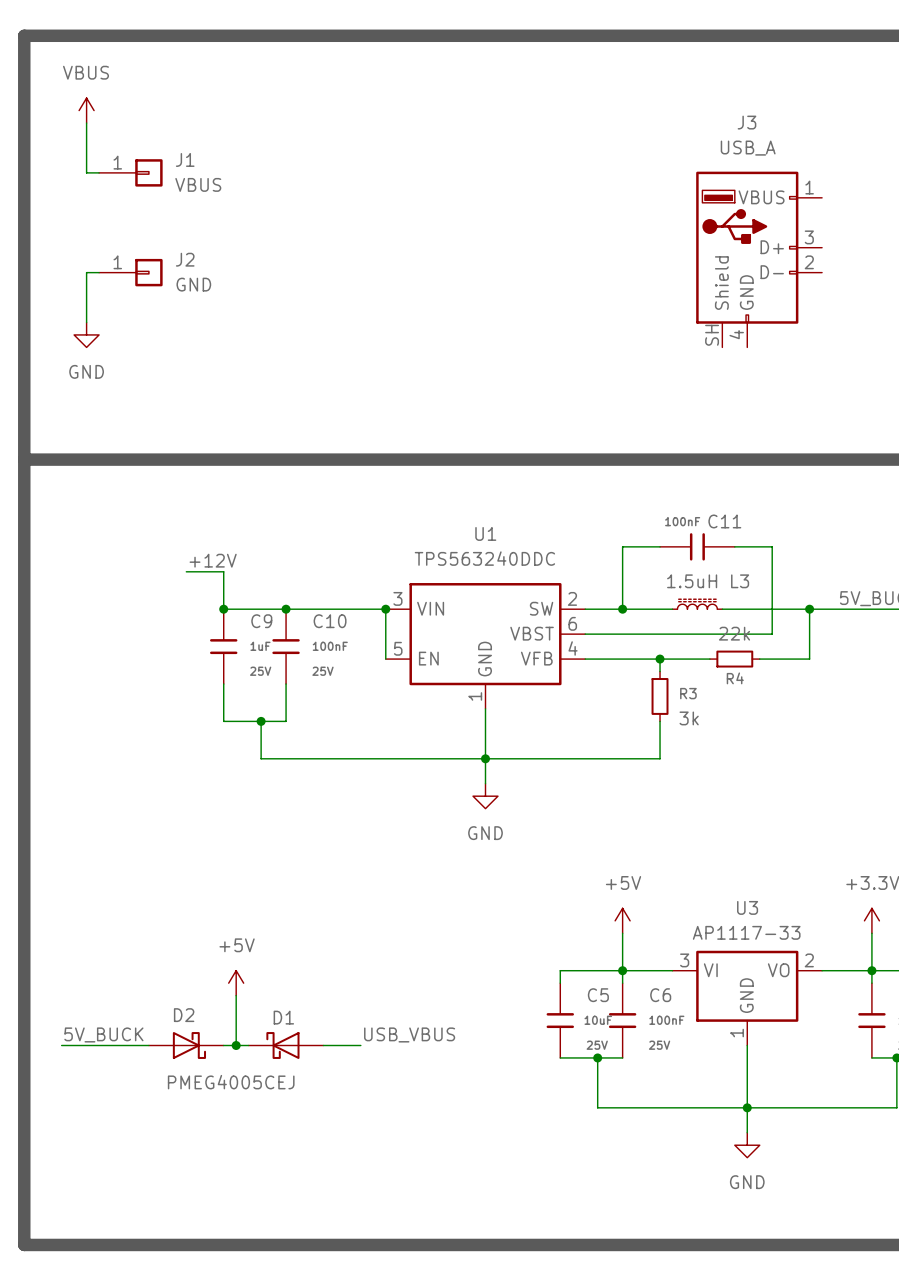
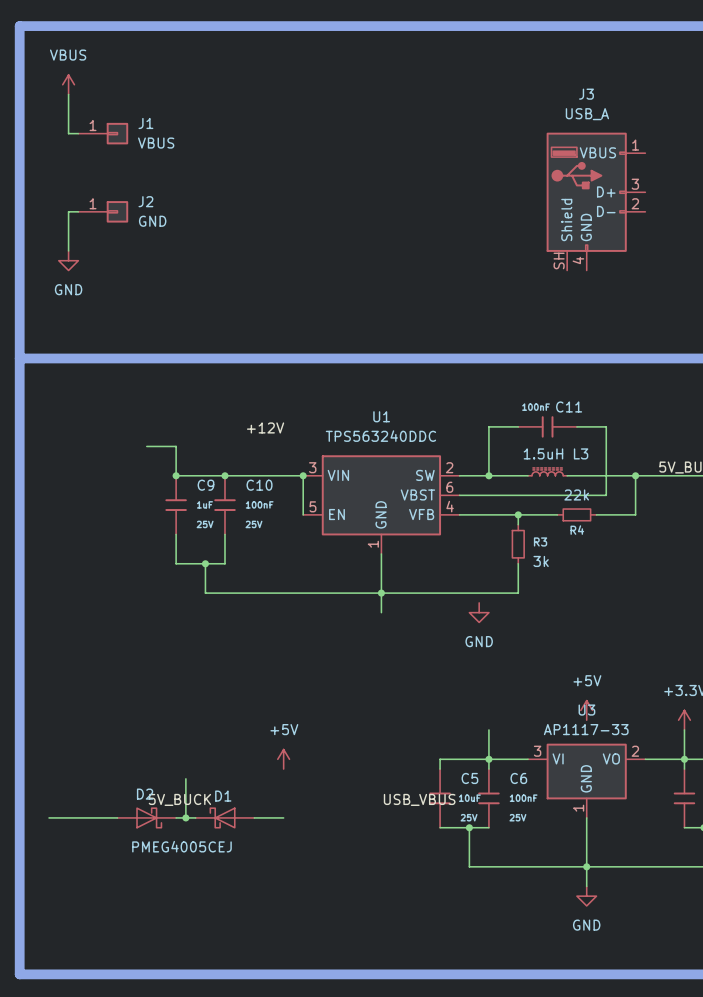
label position: +12V (213, 560) -> +12V (265, 427)
power symbol position: GND (485, 796) -> GND (479, 612)
power symbol position: +5V (622, 920) -> +5V (586, 710)
power symbol position: +5V (236, 983) -> +5V (283, 759)
label position: 5V_BUCK (103, 1034) -> 5V_BUCK (179, 799)
label position: USB_VBUS (409, 1034) -> USB_VBUS (419, 799)

